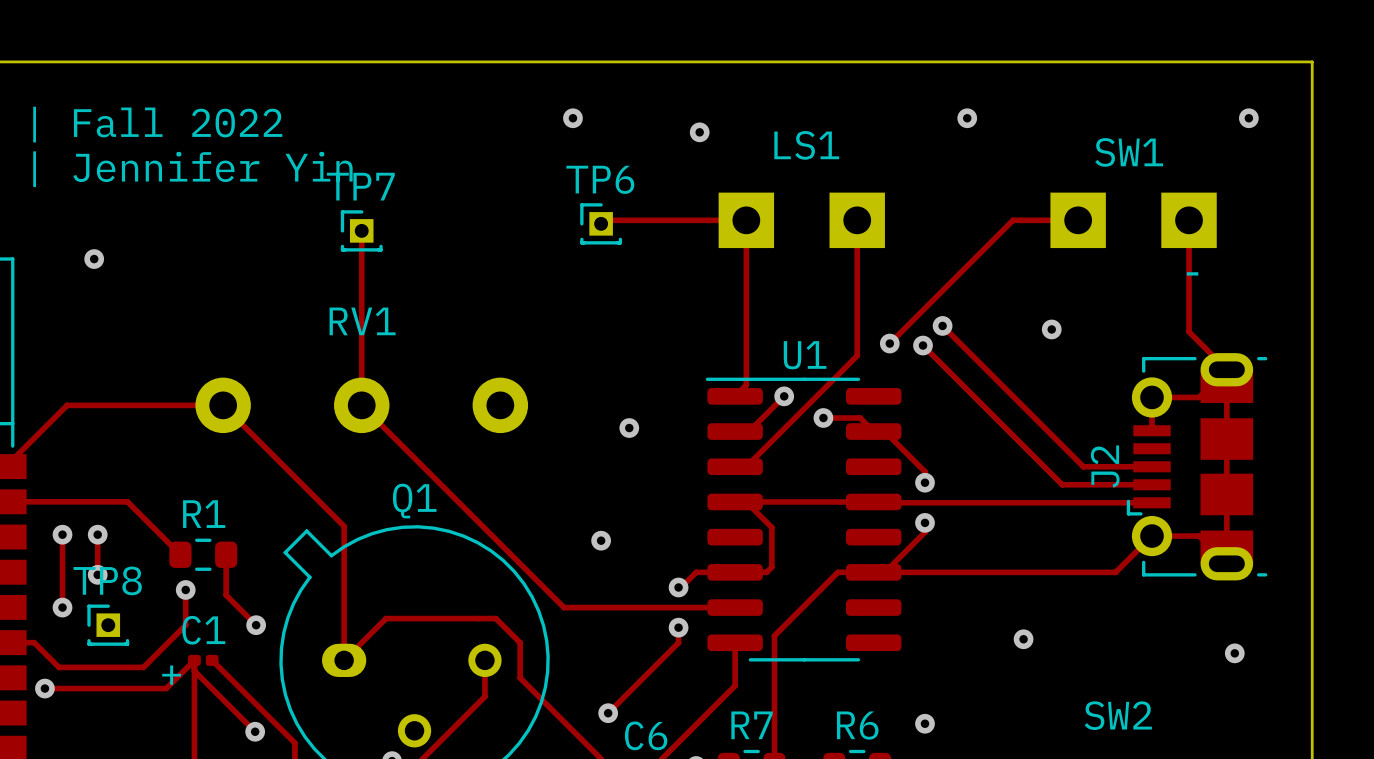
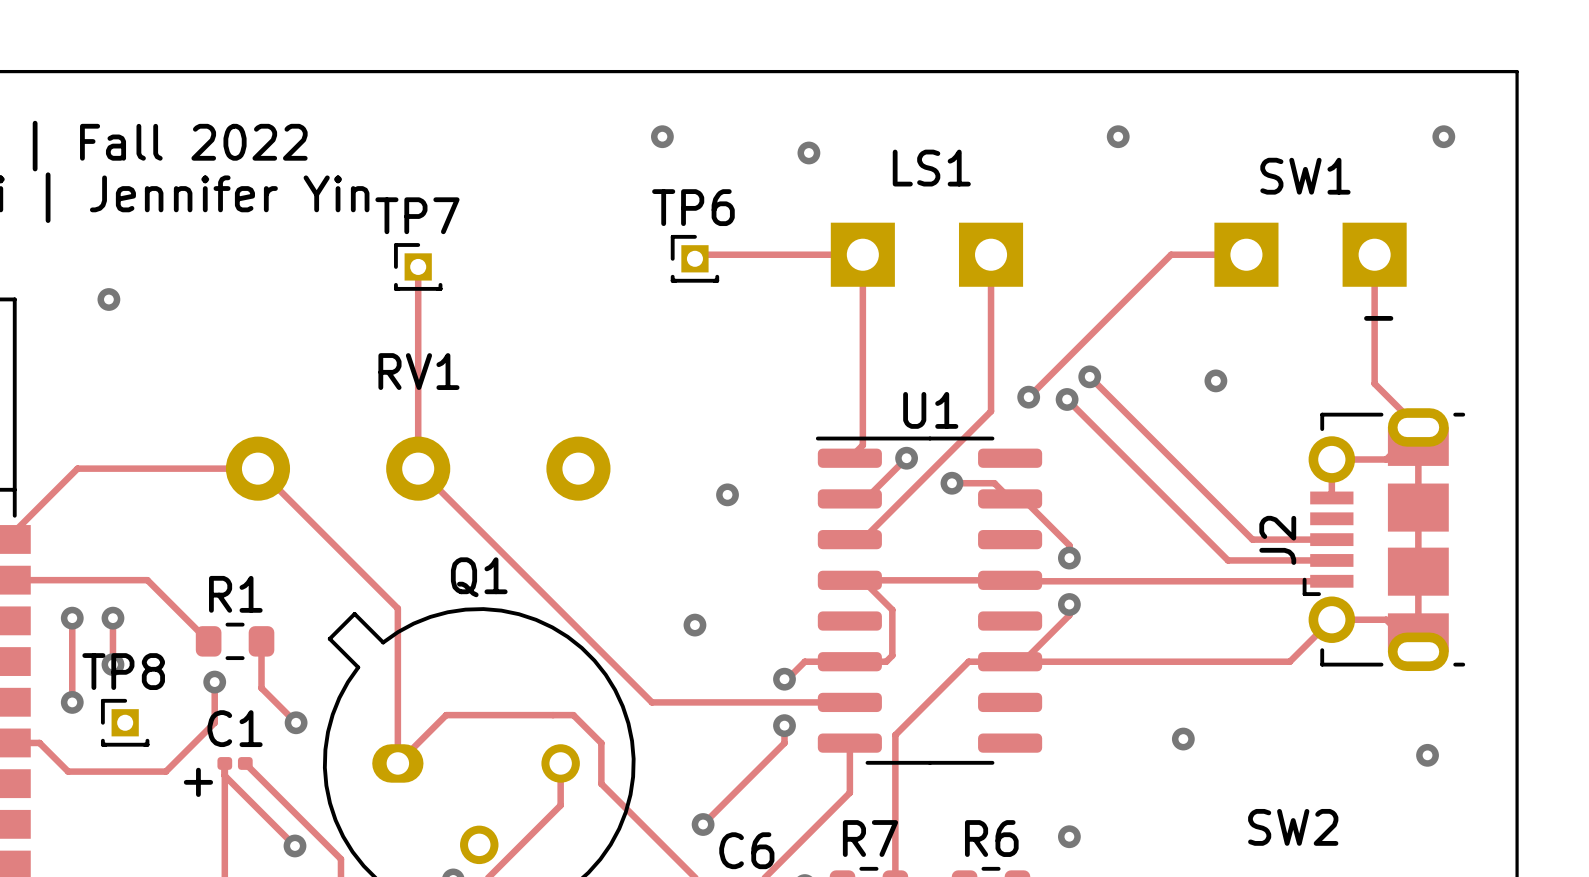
track: (194, 660) (166, 688) (44, 688) -> none
via: (44, 688) -> none

